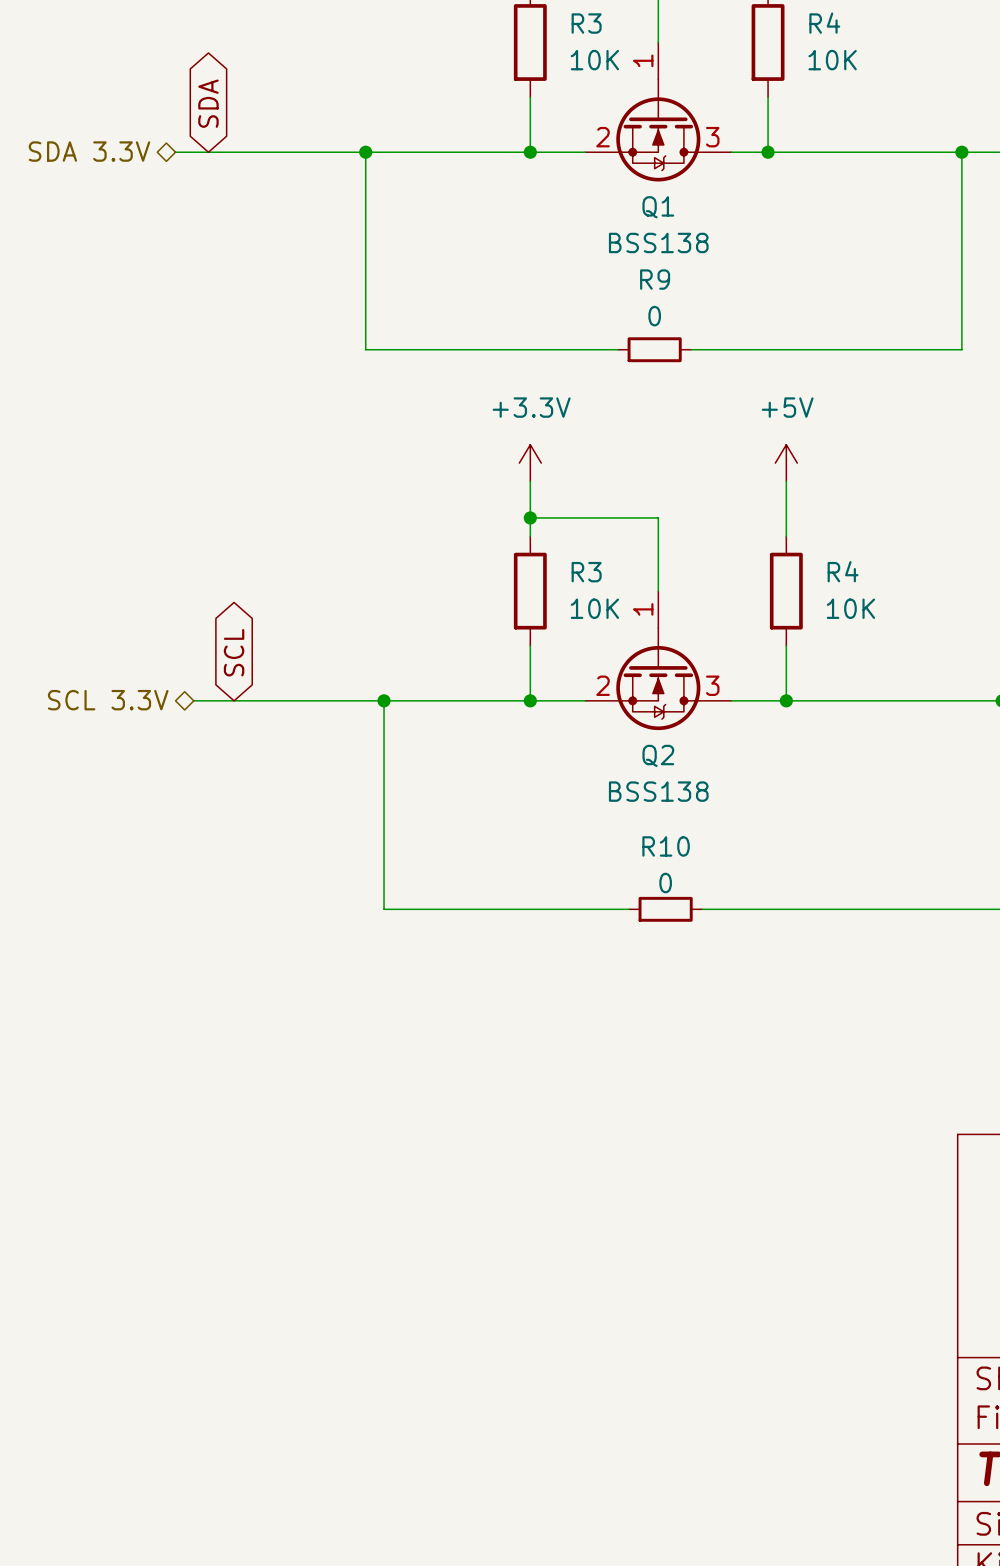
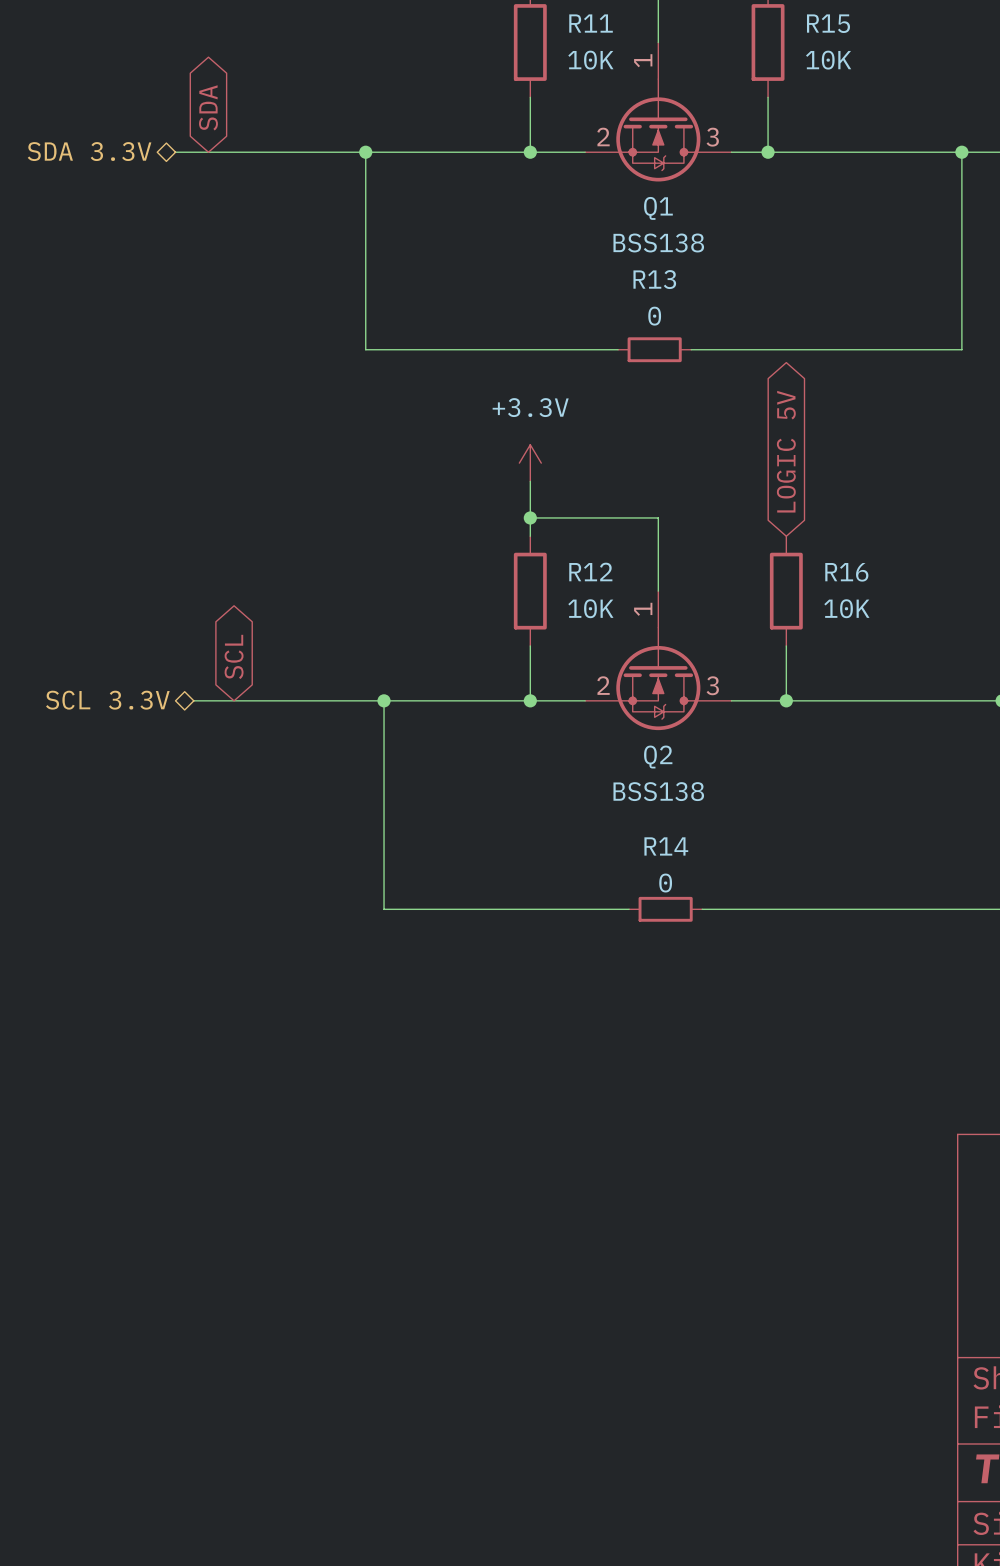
R3 name: R3 (586, 23) -> R11 (591, 23)
R4 name: R4 (824, 23) -> R15 (828, 23)
R9 name: R9 (655, 279) -> R13 (654, 279)
global label: none -> LOGIC 5V (786, 451)
power symbol: +5V (786, 463) -> none
wire: (786, 481) (786, 536) -> none
R4 name: R4 (843, 571) -> R16 (846, 572)
R3 name: R3 (586, 572) -> R12 (590, 571)
R10 name: R10 (666, 846) -> R14 (666, 846)

